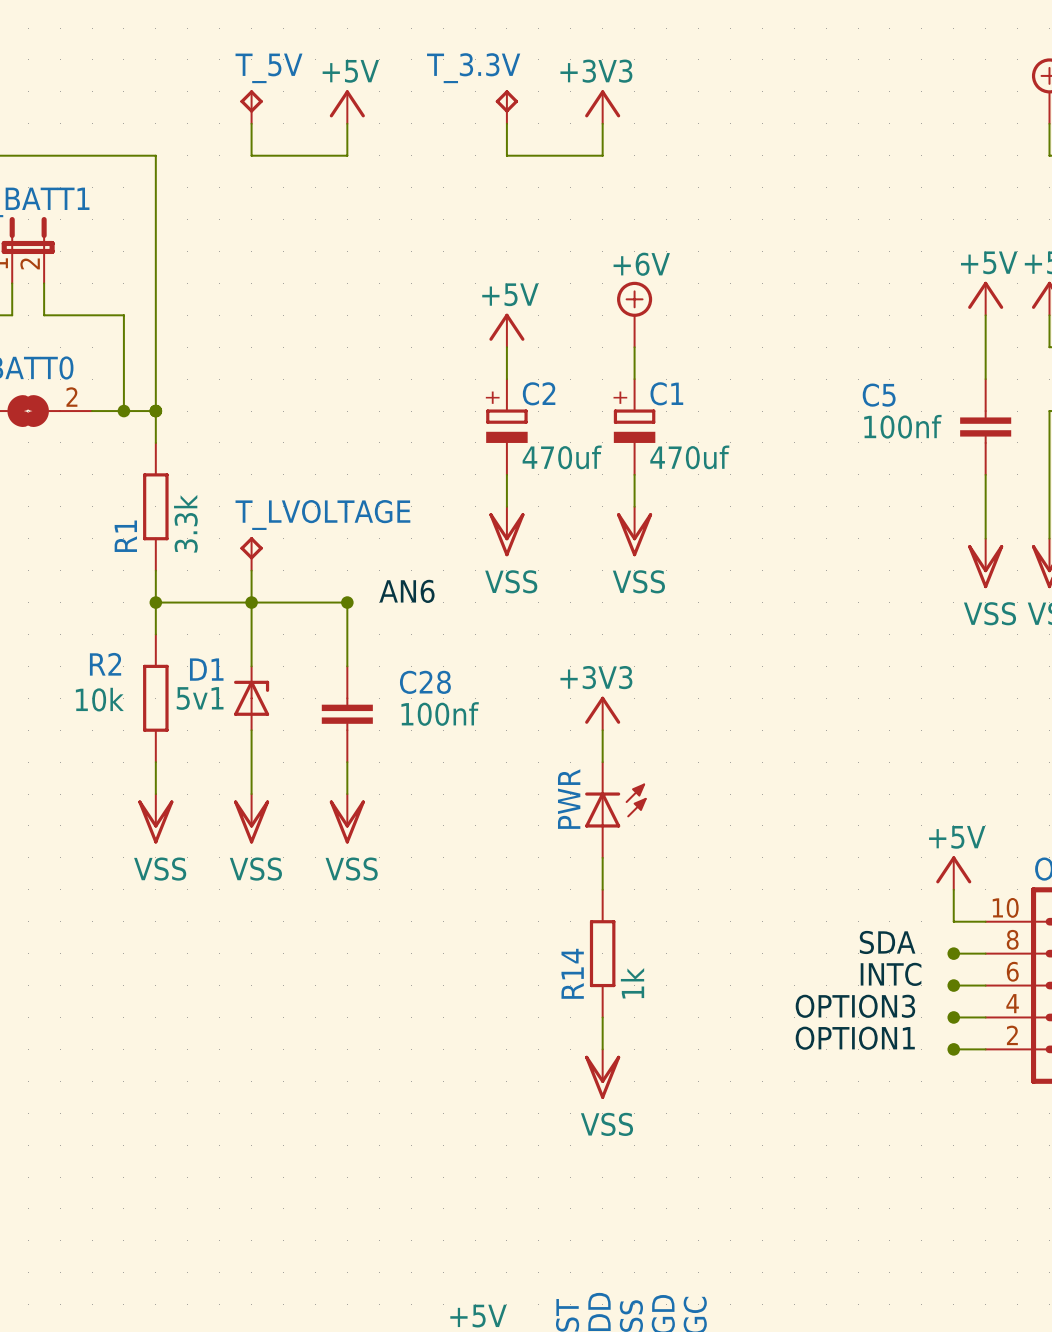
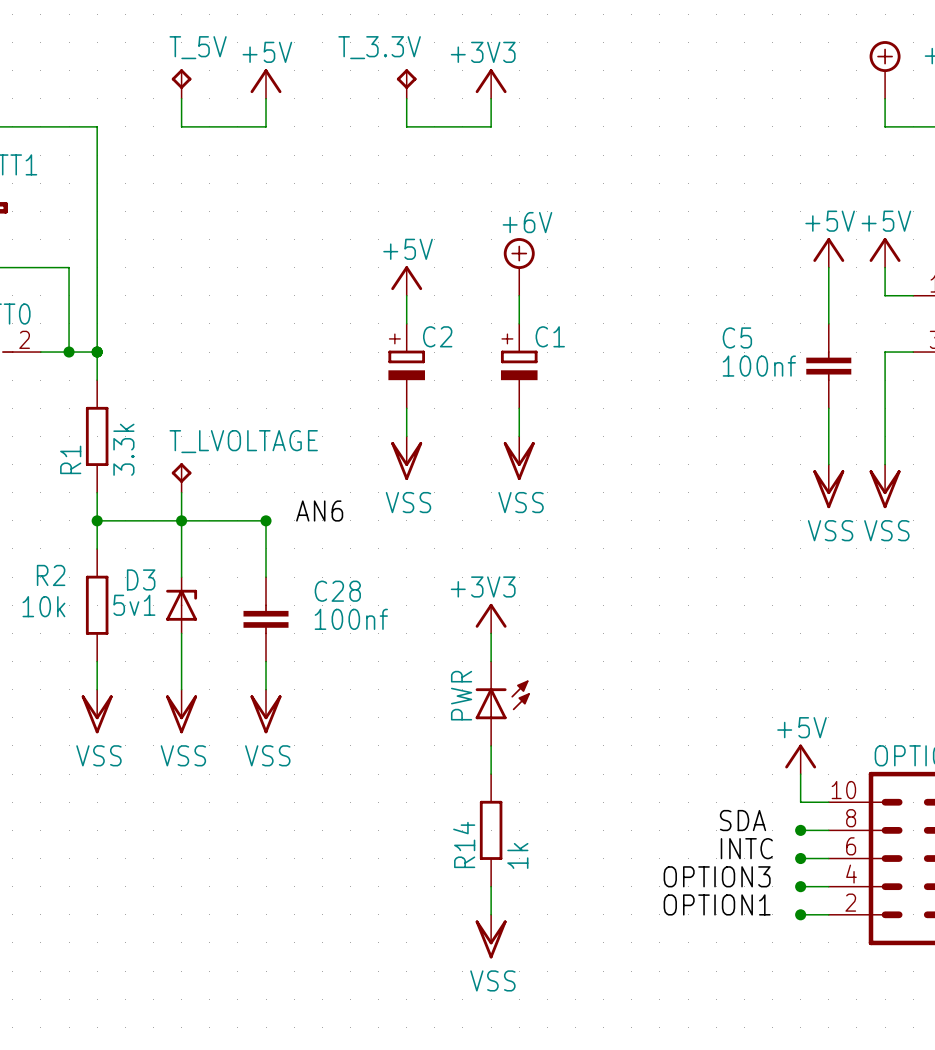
C2 value: 470uf (562, 457) -> none
C1 value: 470uf (689, 457) -> none
D1 name: D1 (206, 669) -> D3 (141, 579)

